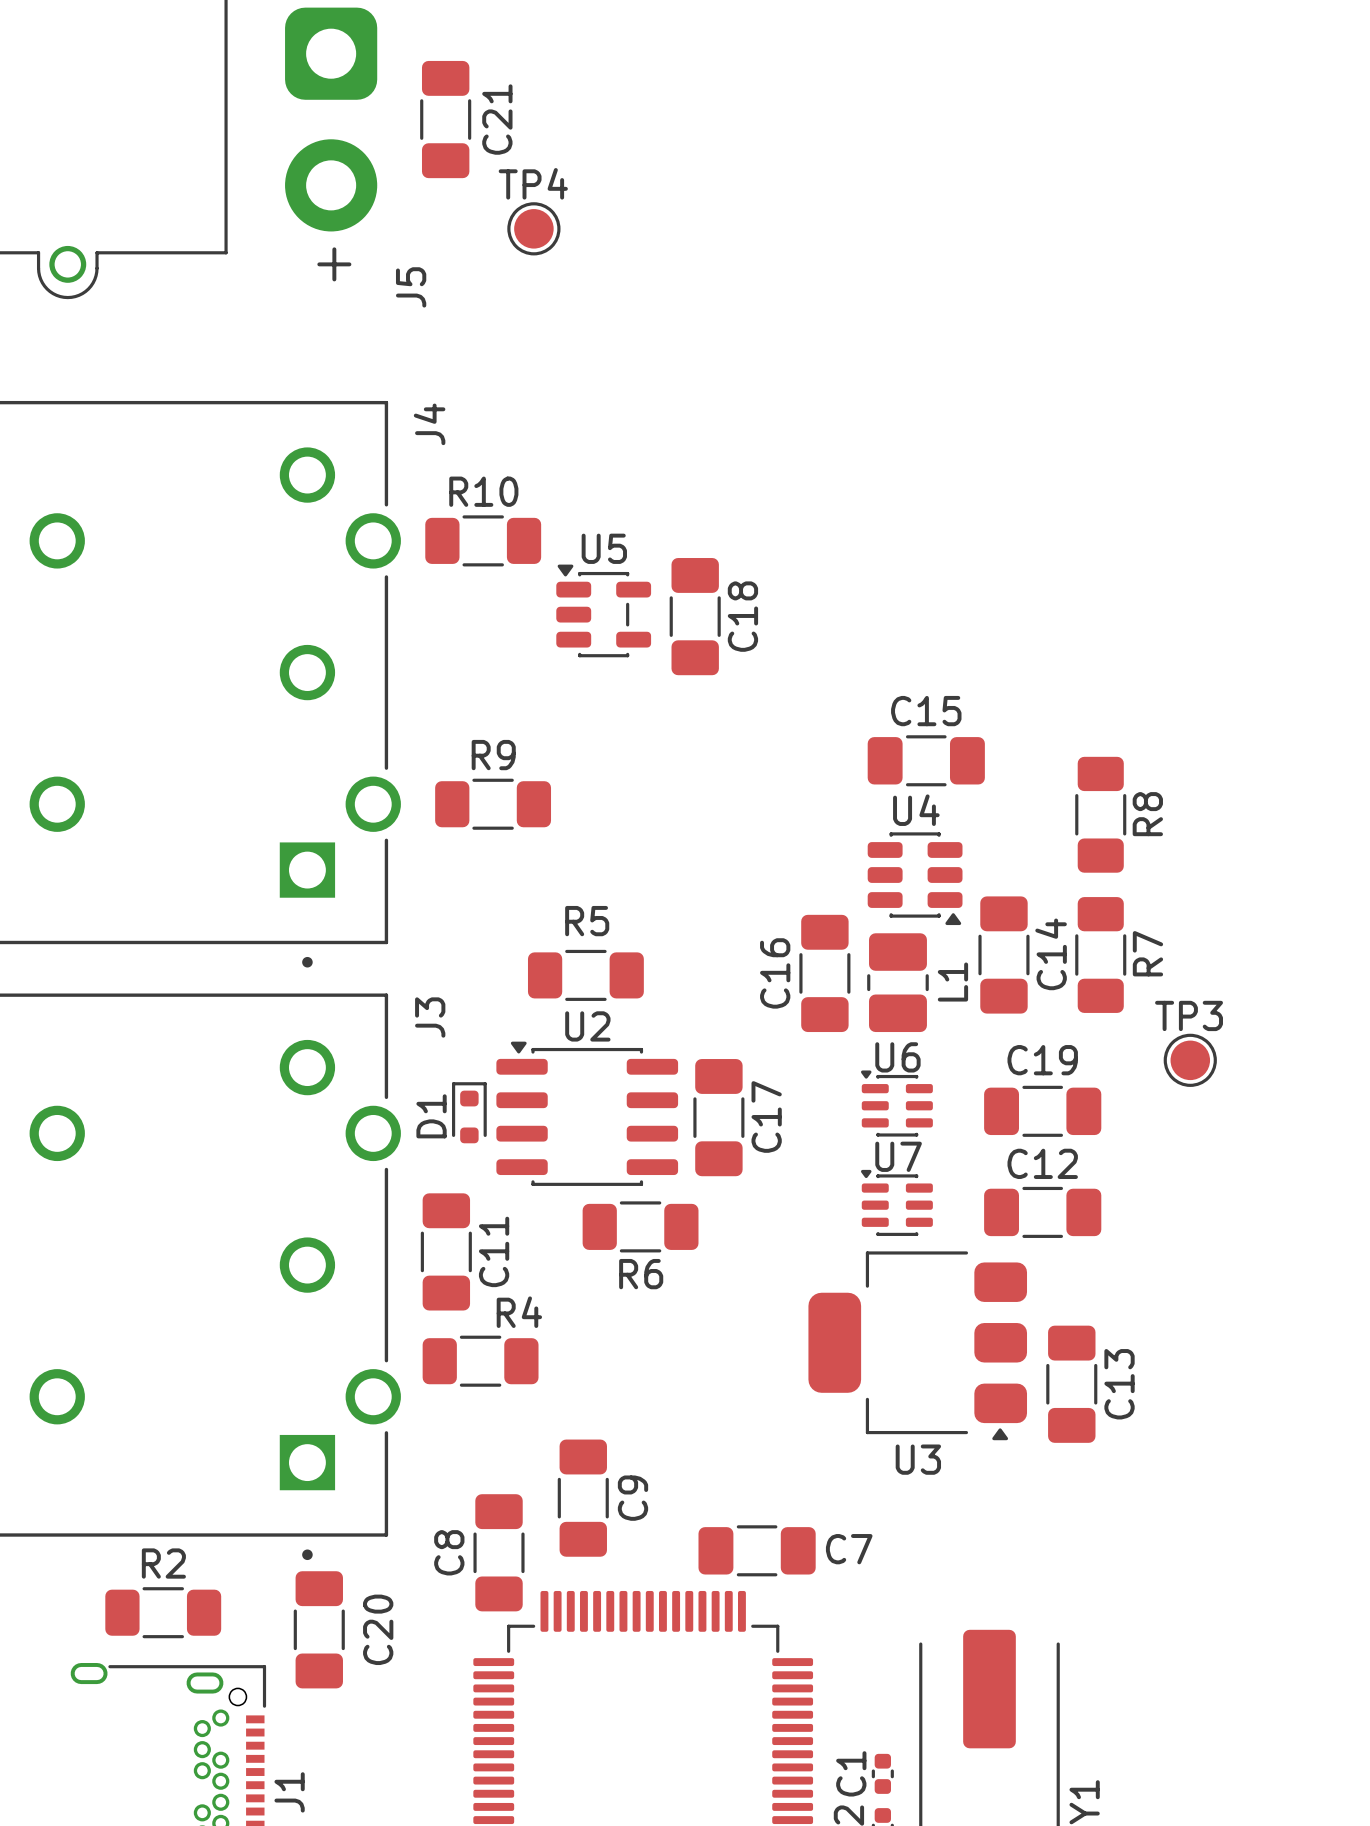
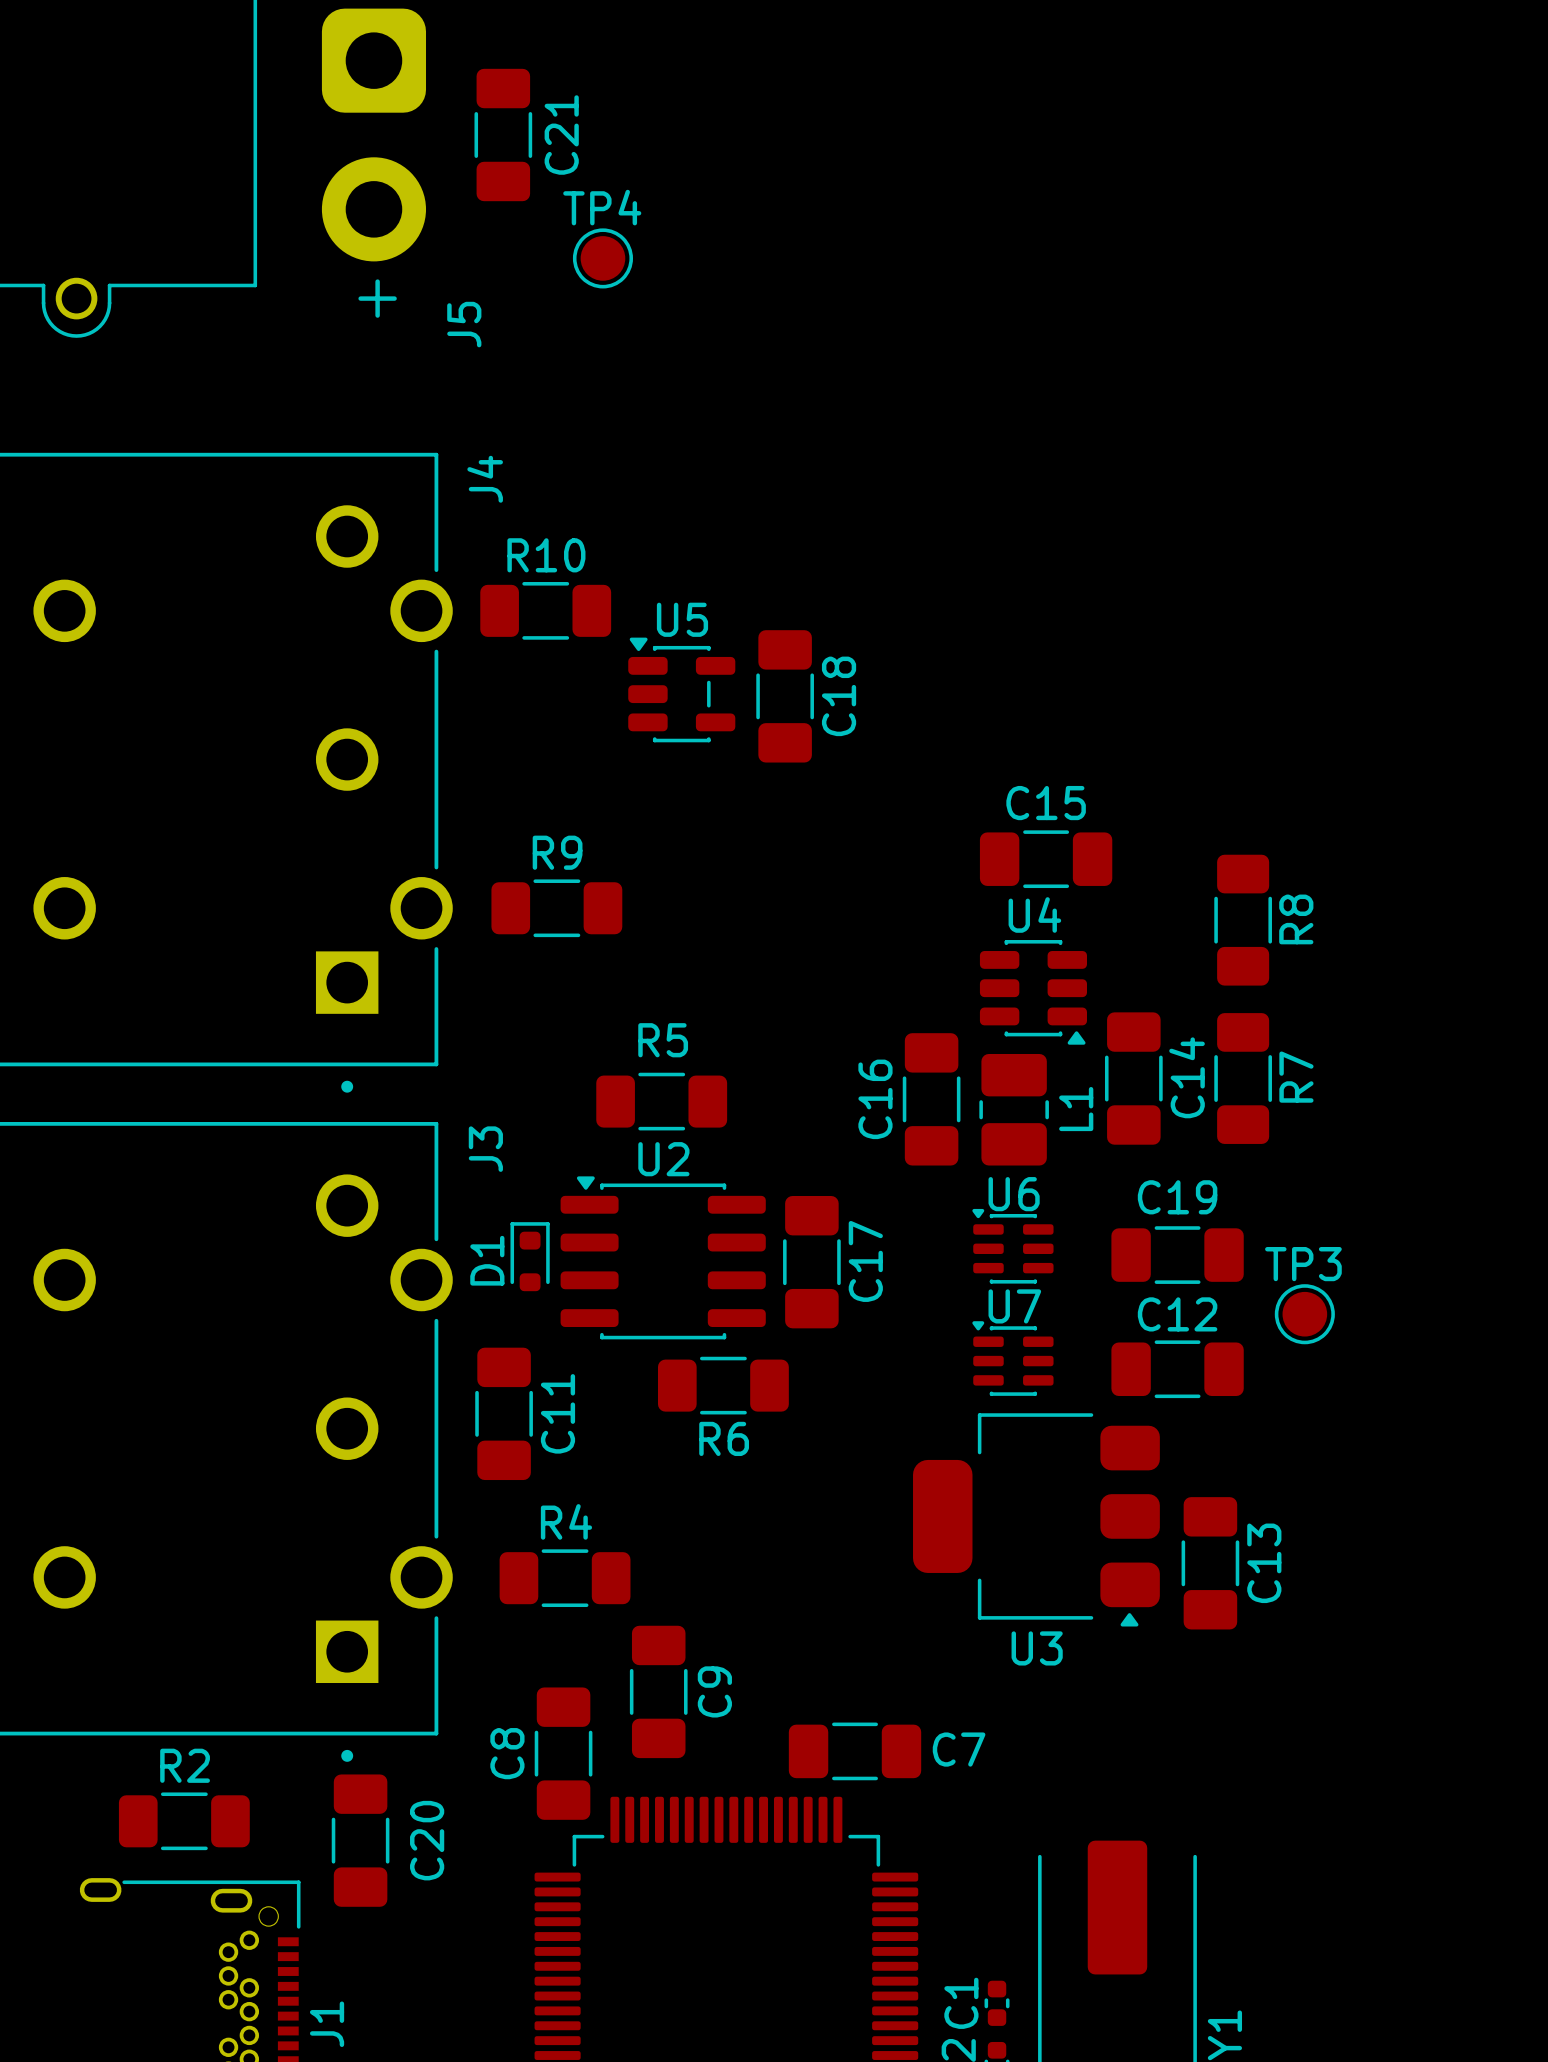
TP3 position: (1190, 1060) -> (1304, 1314)
R4 name position: R4 (519, 1312) -> R4 (566, 1521)
R4 position: (480, 1361) -> (565, 1578)

